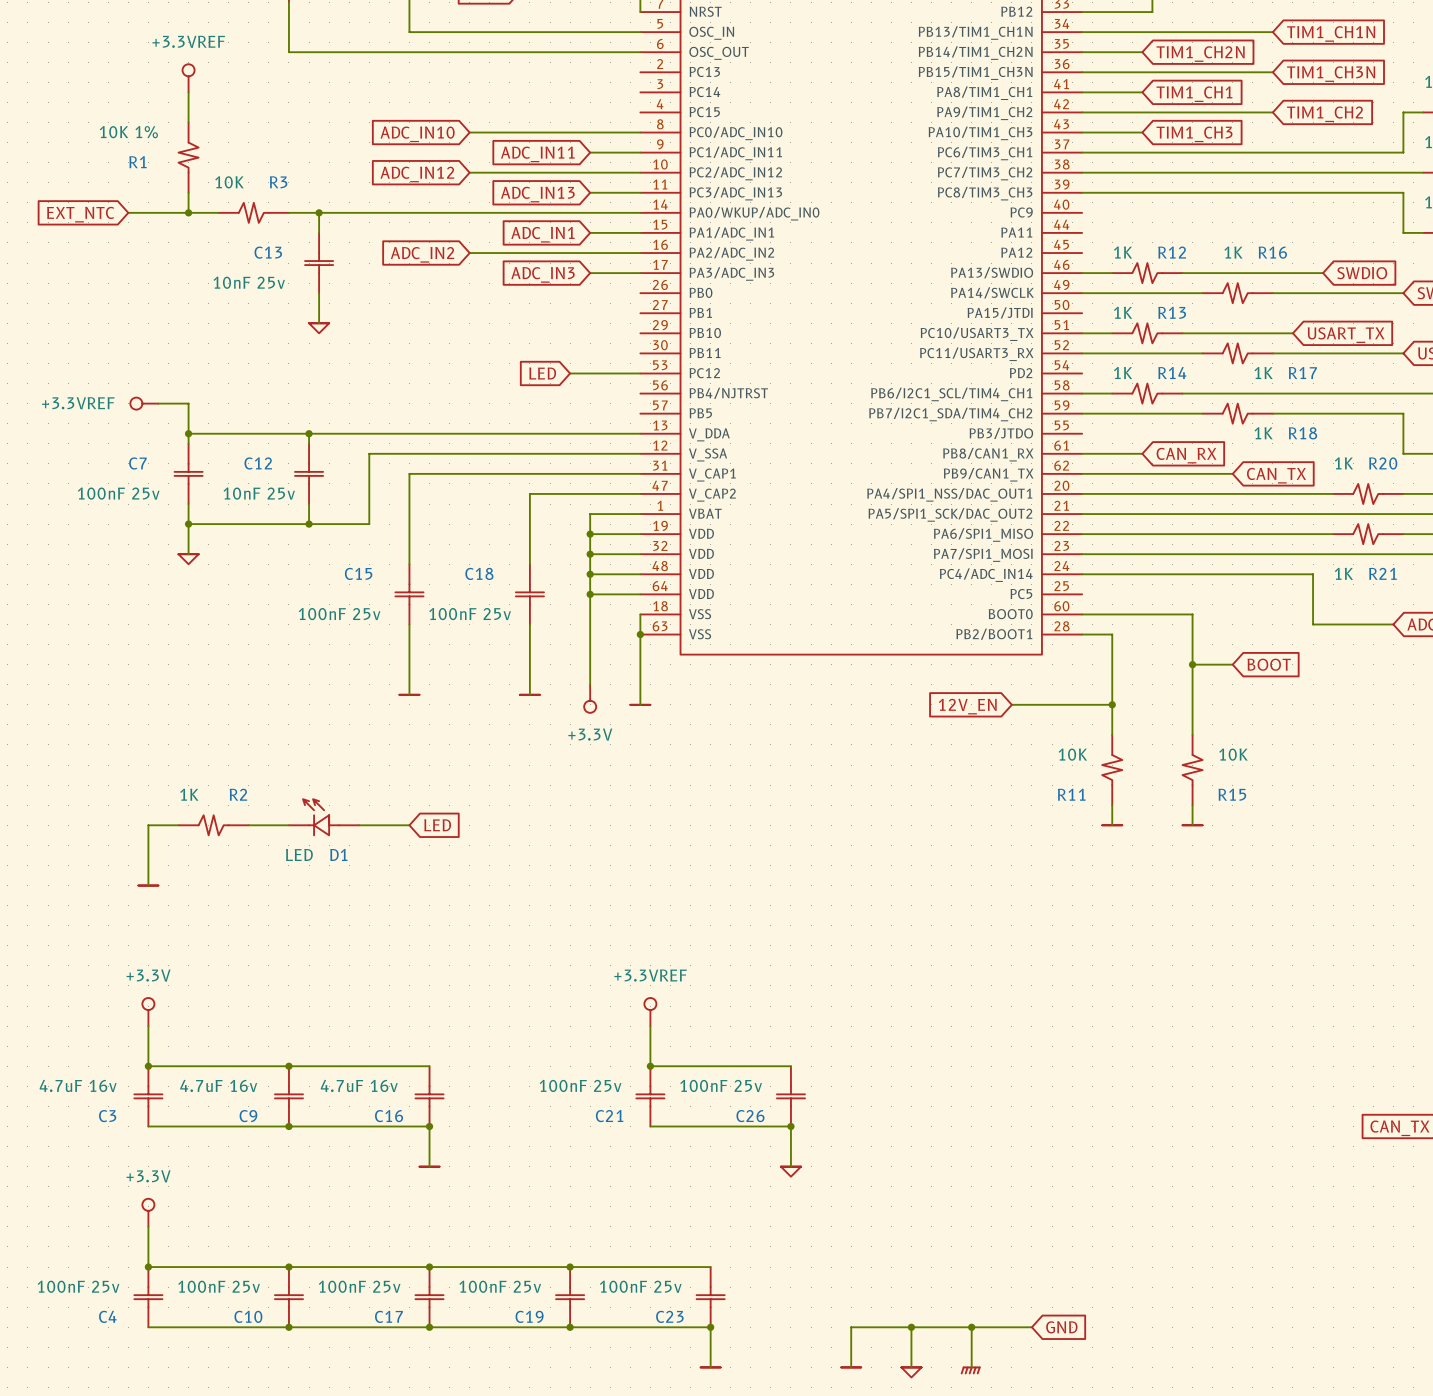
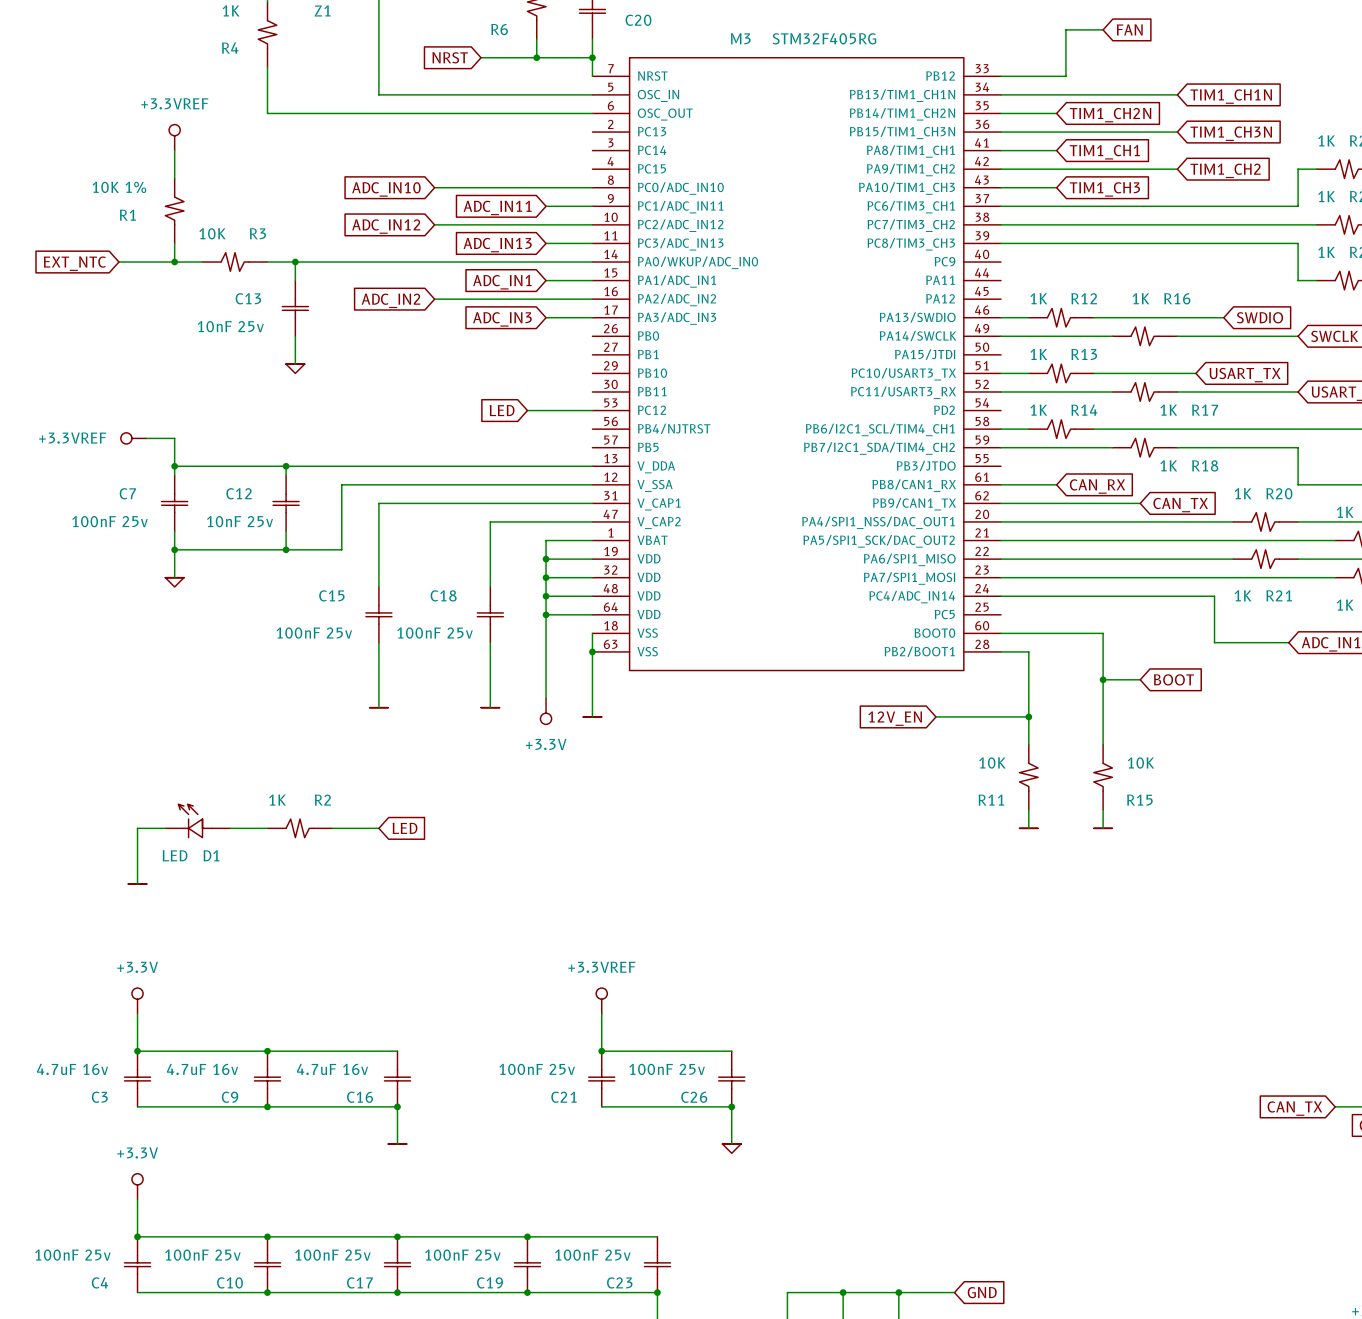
D1 position: (324, 817) -> (197, 820)
R2 position: (213, 825) -> (300, 828)

